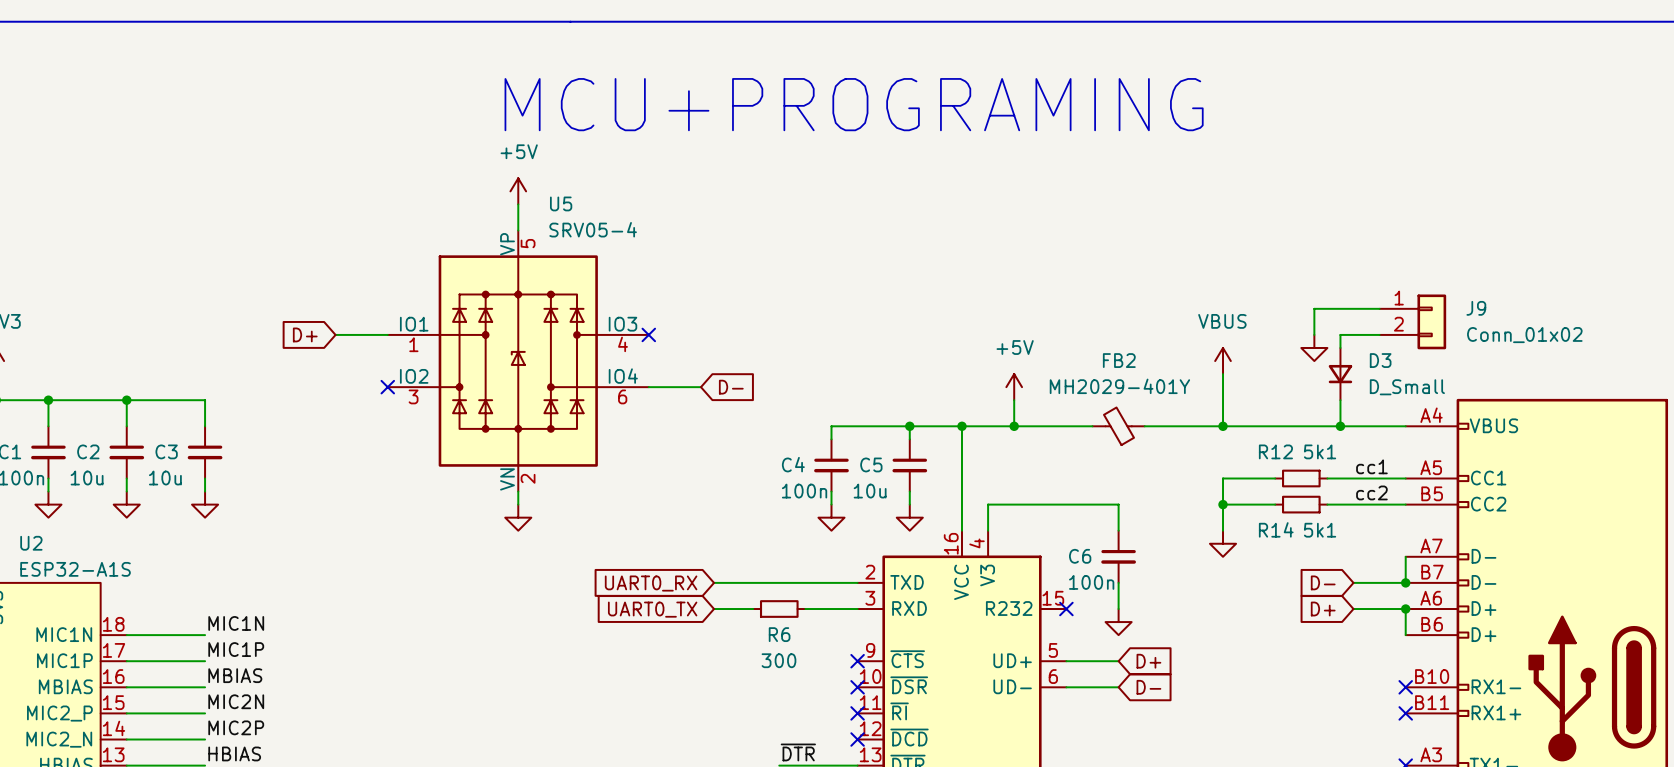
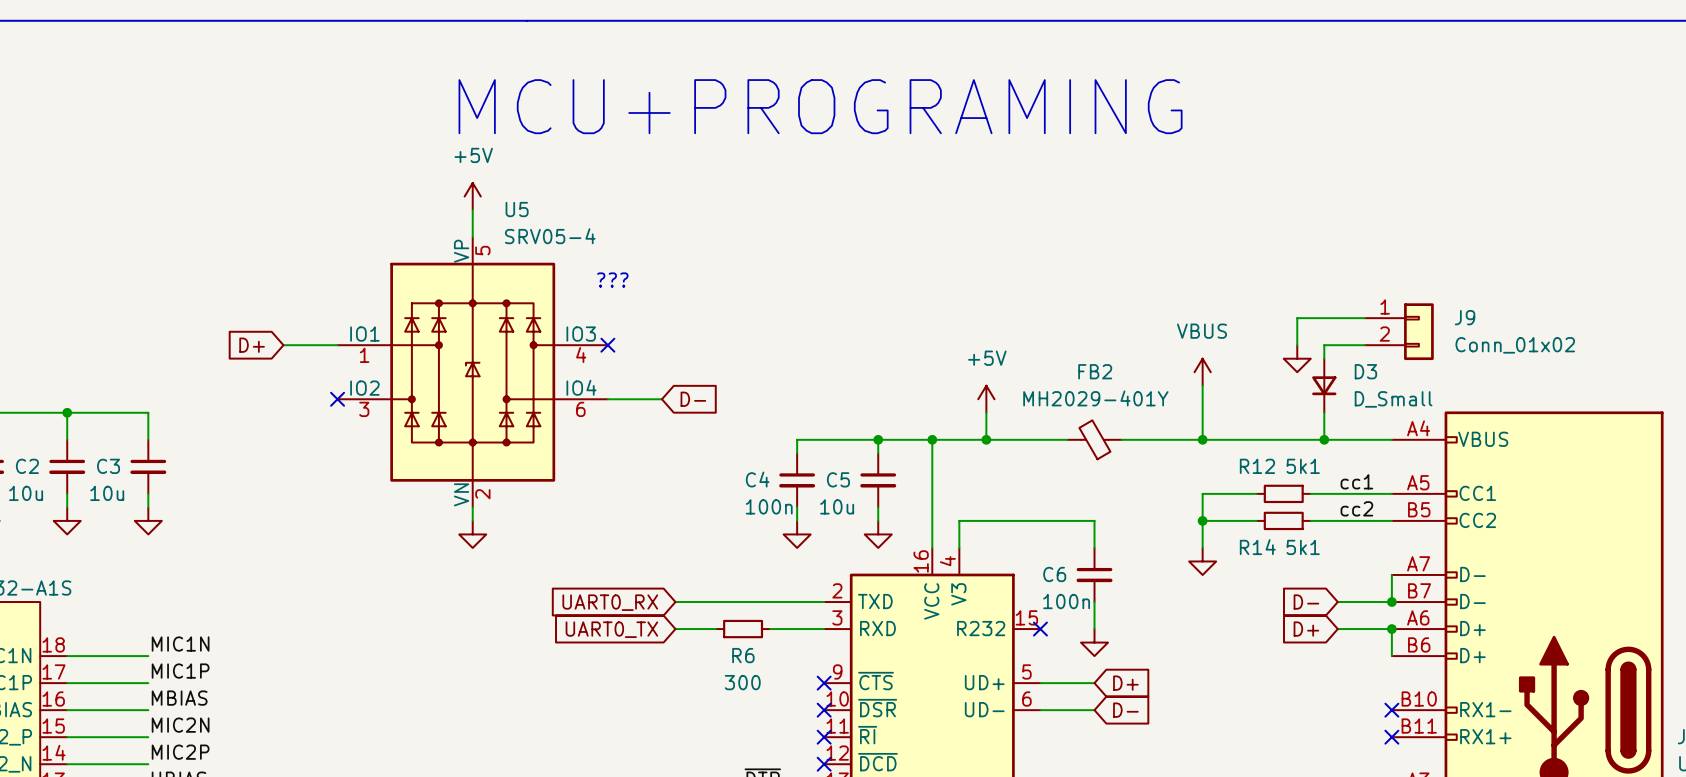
text: none -> ??? (612, 280)

